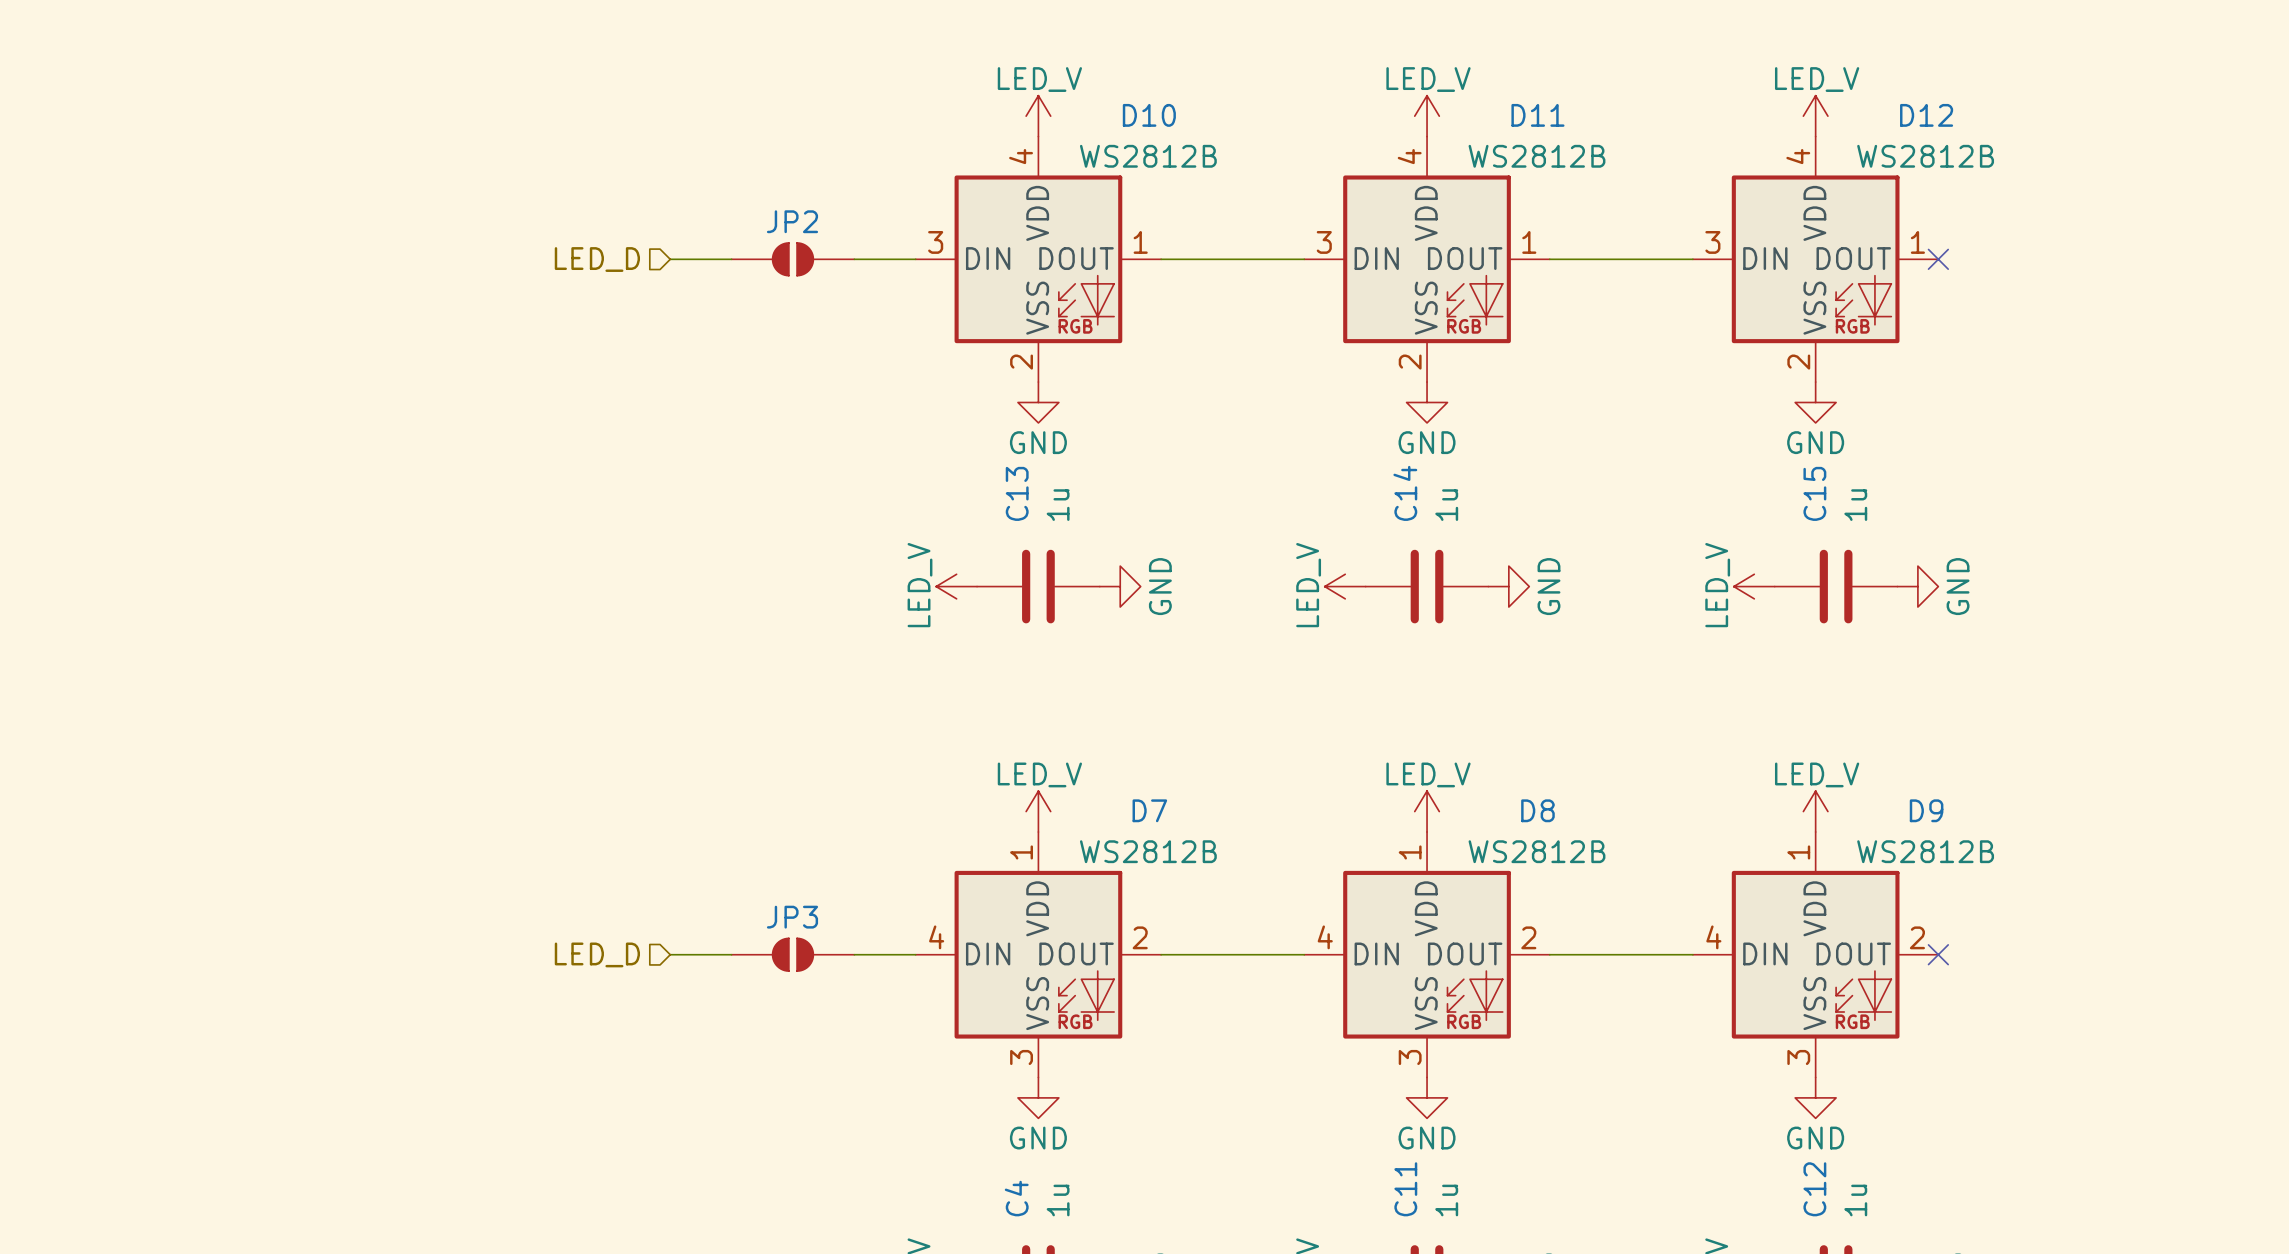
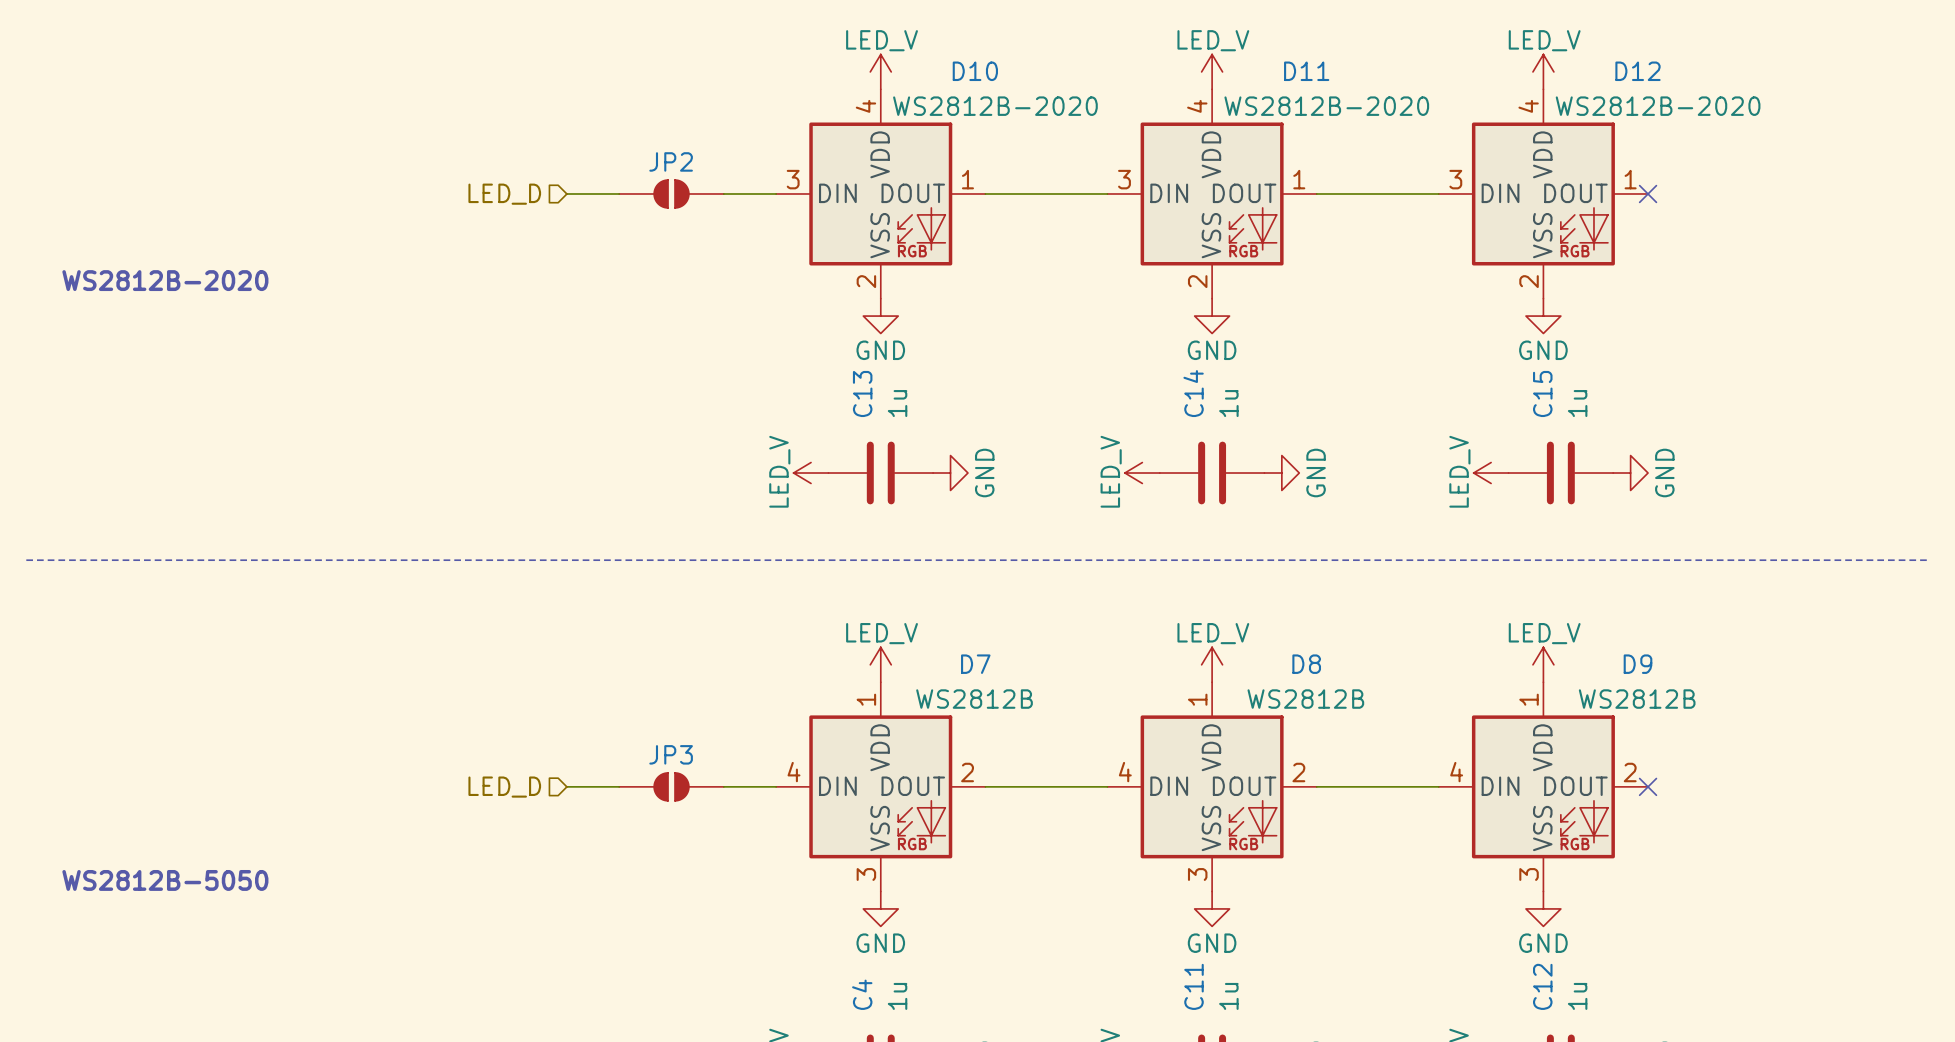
D10 value: WS2812B (1148, 156) -> WS2812B-2020 (995, 106)
D11 value: WS2812B (1536, 156) -> WS2812B-2020 (1326, 106)
D12 value: WS2812B (1925, 156) -> WS2812B-2020 (1658, 106)
text: none -> WS2812B-2020 (165, 280)
line: none -> (26, 560) (1927, 560)
text: none -> WS2812B-5050 (165, 880)

